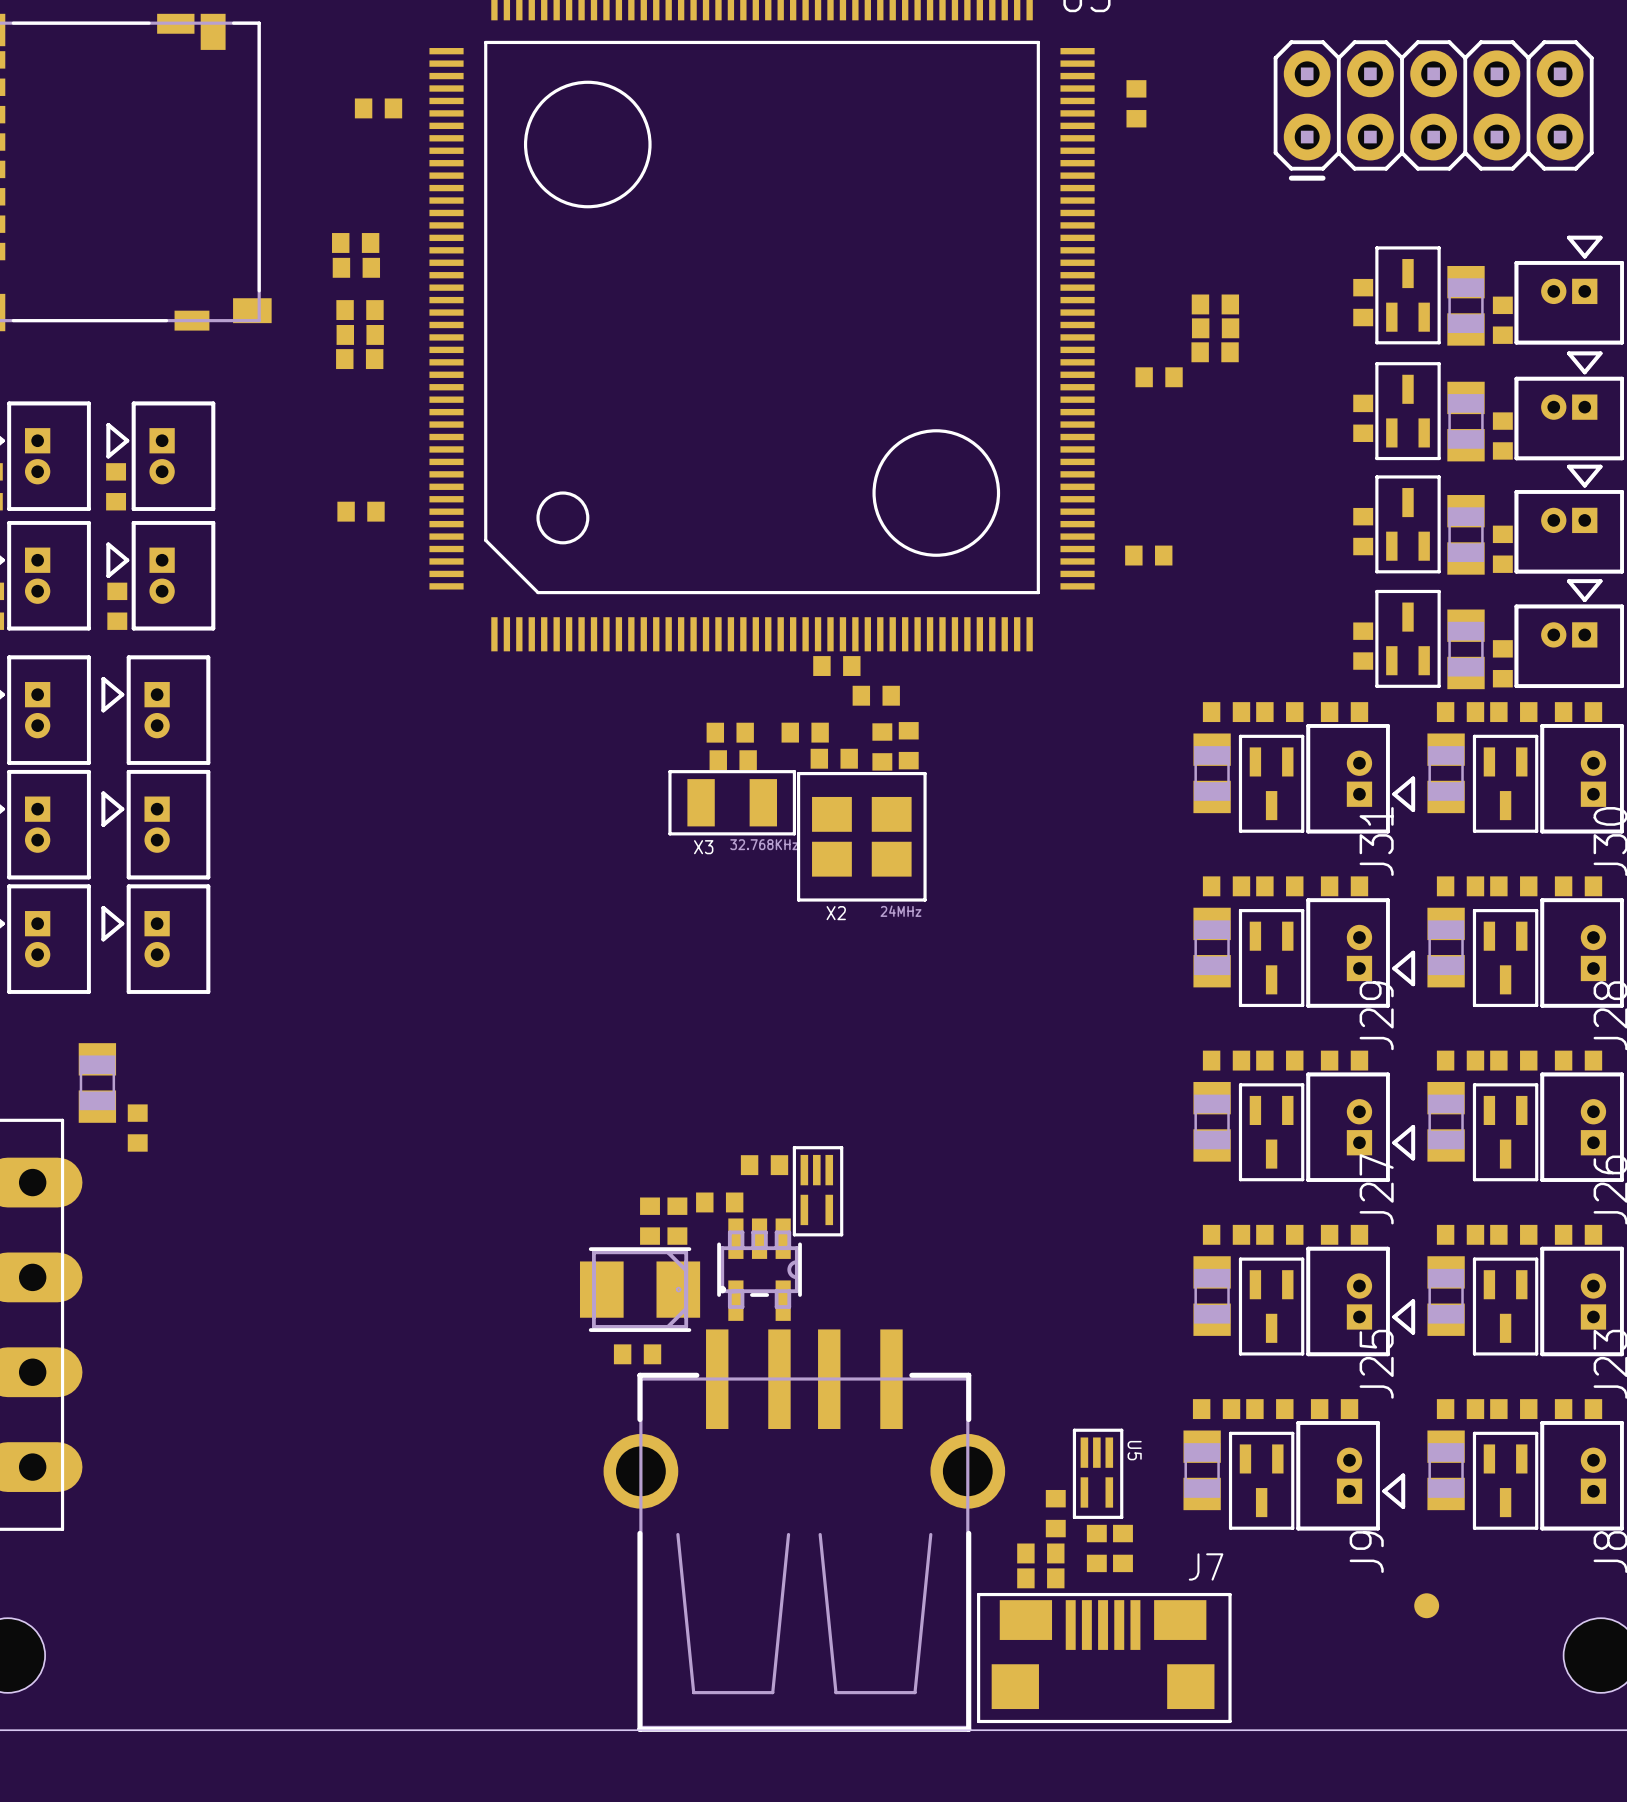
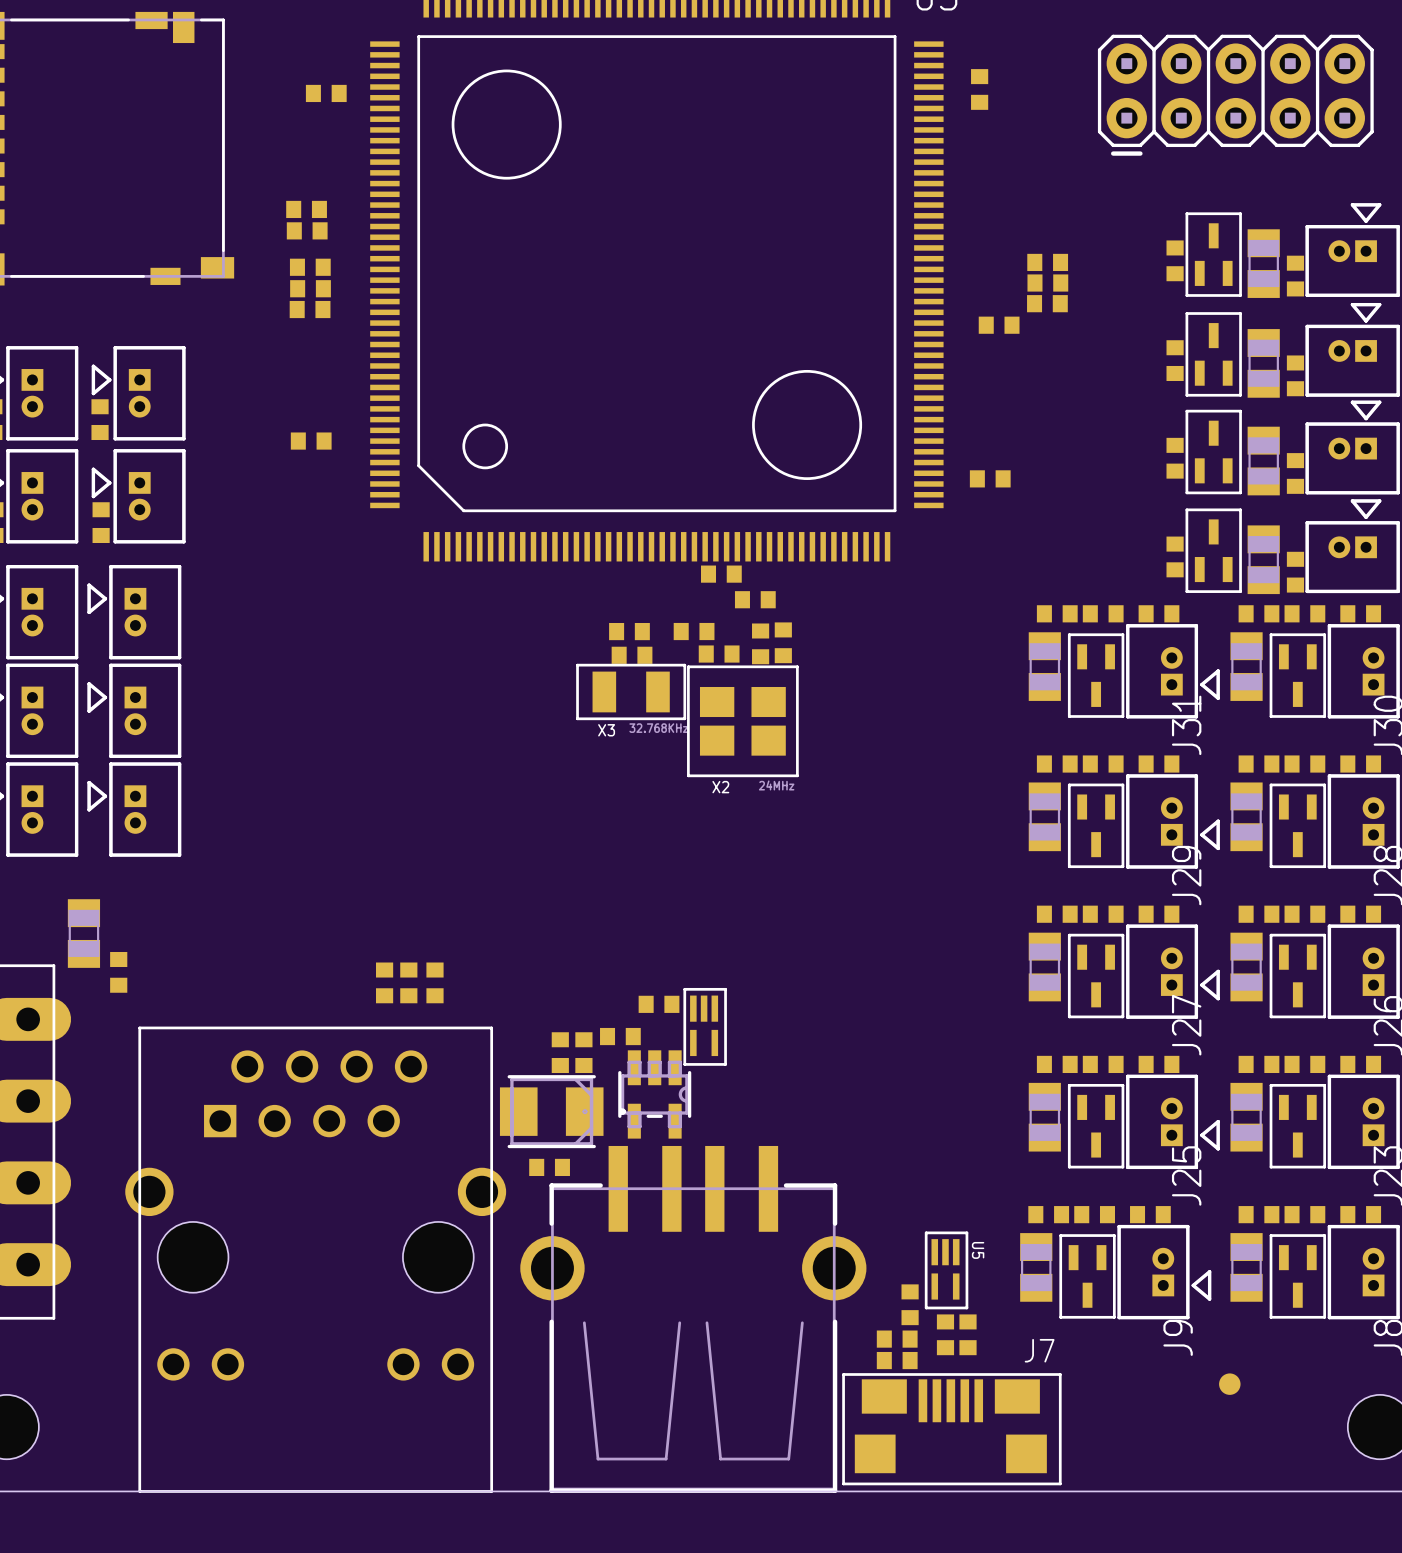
part: none -> (384, 982)
part: none -> (408, 982)
part: none -> (435, 982)
part: none -> (315, 1259)

